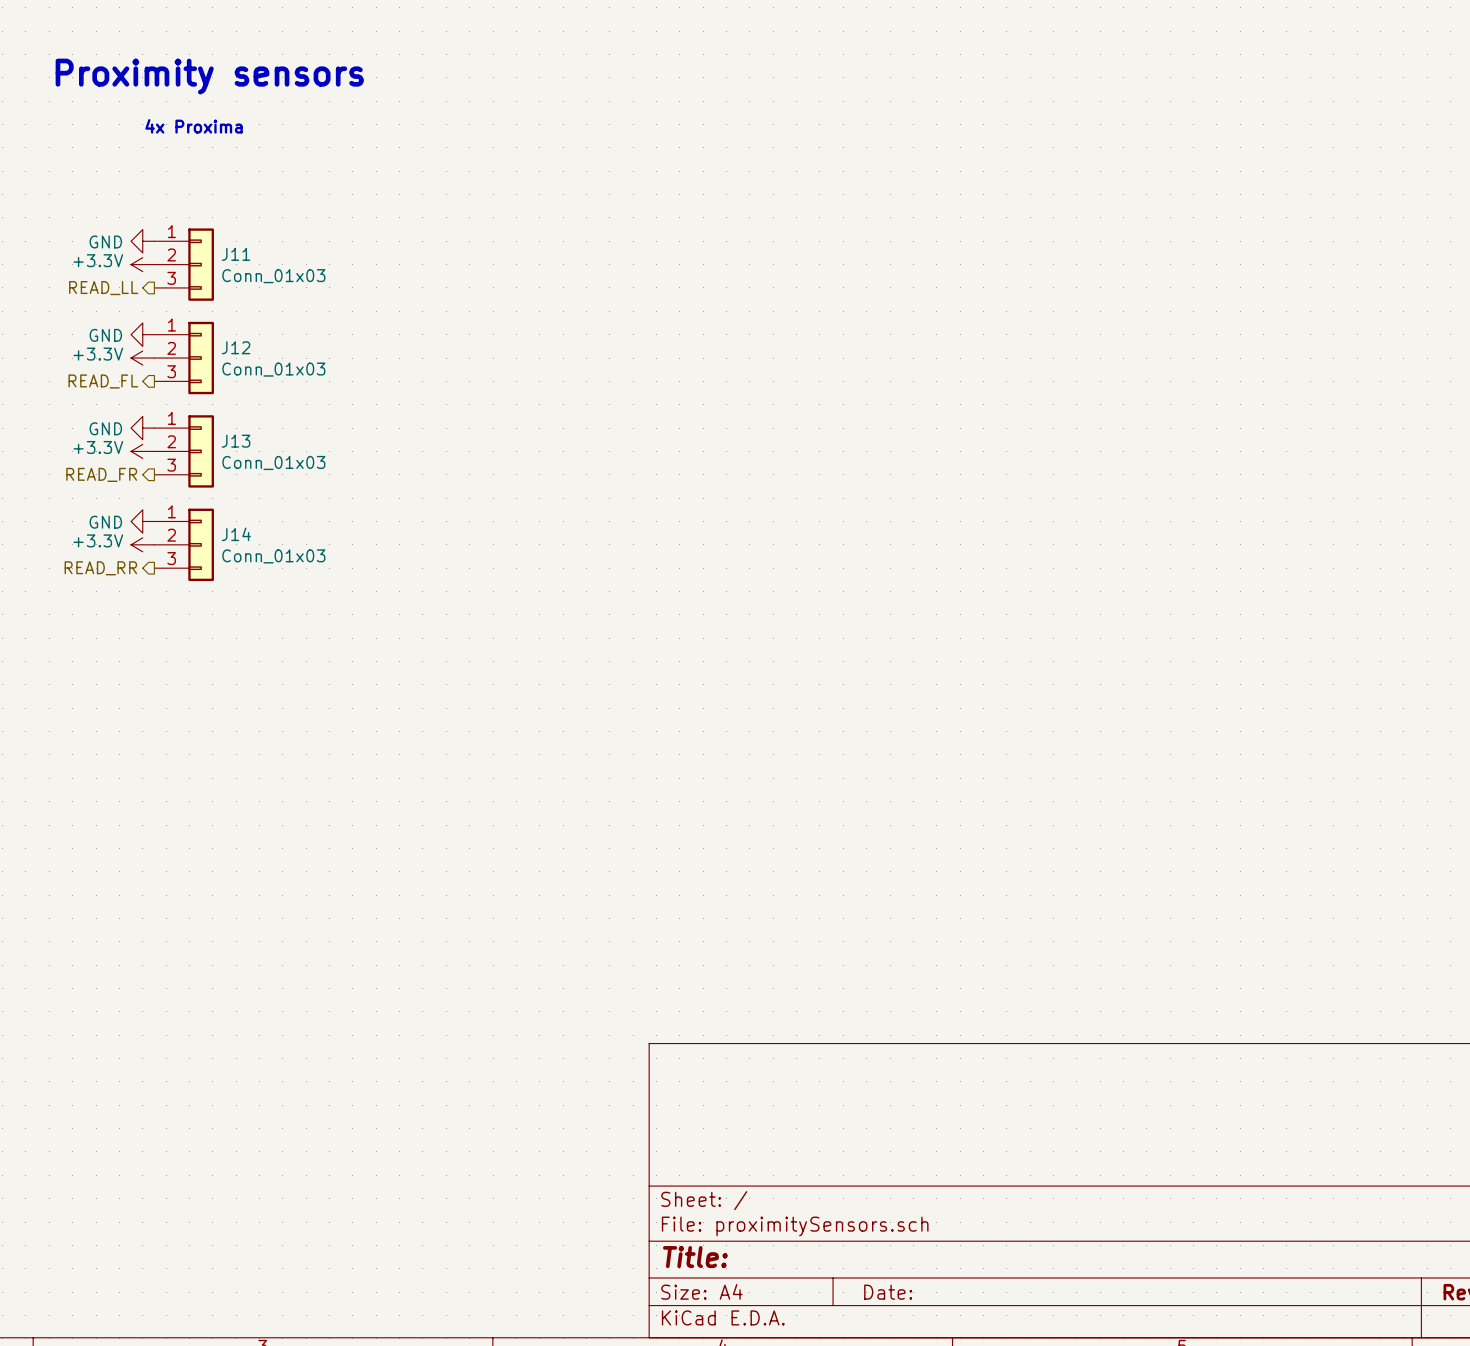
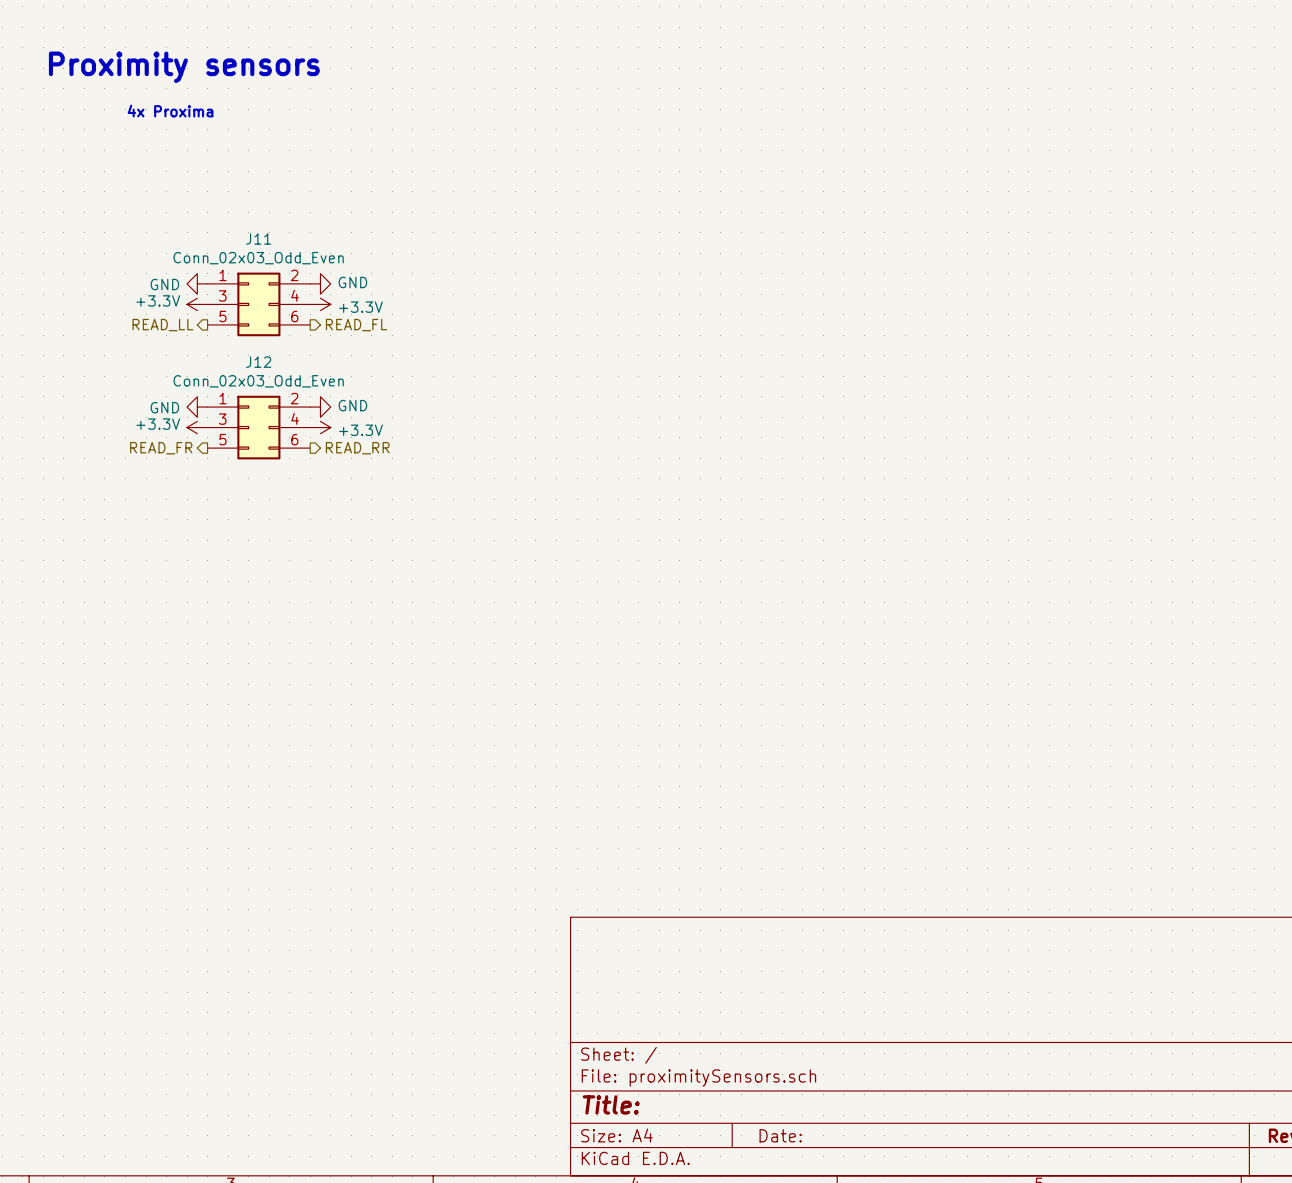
J11 symbol: [154, 228, 214, 301] -> [207, 272, 311, 337]
power symbol: GND (142, 241) -> none
J11 name position: J11 (236, 254) -> J11 (258, 238)
power symbol: +3.3V (142, 264) -> none
J11 value: Conn_01x03 (273, 276) -> Conn_02x03_Odd_Even (258, 258)
hierarchical label position: READ_LL (103, 288) -> READ_LL (162, 325)
J12 symbol: [154, 321, 214, 395] -> [207, 395, 311, 460]
power symbol: none -> GND (197, 283)
power symbol: none -> GND (320, 283)
power symbol: GND (142, 334) -> none
power symbol: none -> +3.3V (197, 304)
power symbol: none -> +3.3V (320, 304)
J12 name position: J12 (236, 347) -> J12 (258, 362)
power symbol: +3.3V (142, 358) -> none
J12 value: Conn_01x03 (273, 369) -> Conn_02x03_Odd_Even (258, 381)
hierarchical label rotation: 0° (103, 381) -> 180° (356, 325)
hierarchical label position: READ_FL (103, 381) -> READ_FL (356, 325)
power symbol: GND (142, 428) -> none
power symbol: +3.3V (142, 451) -> none
J13: Conn_01x03 (184, 451) -> none
power symbol: none -> GND (197, 407)
power symbol: none -> GND (320, 407)
hierarchical label position: READ_FR (101, 474) -> READ_FR (161, 448)
power symbol: none -> +3.3V (197, 427)
power symbol: none -> +3.3V (320, 427)
hierarchical label: none -> READ_RR (357, 448)
power symbol: GND (142, 521) -> none
power symbol: +3.3V (142, 544) -> none
J14: Conn_01x03 (184, 544) -> none
hierarchical label: READ_RR (100, 568) -> none

